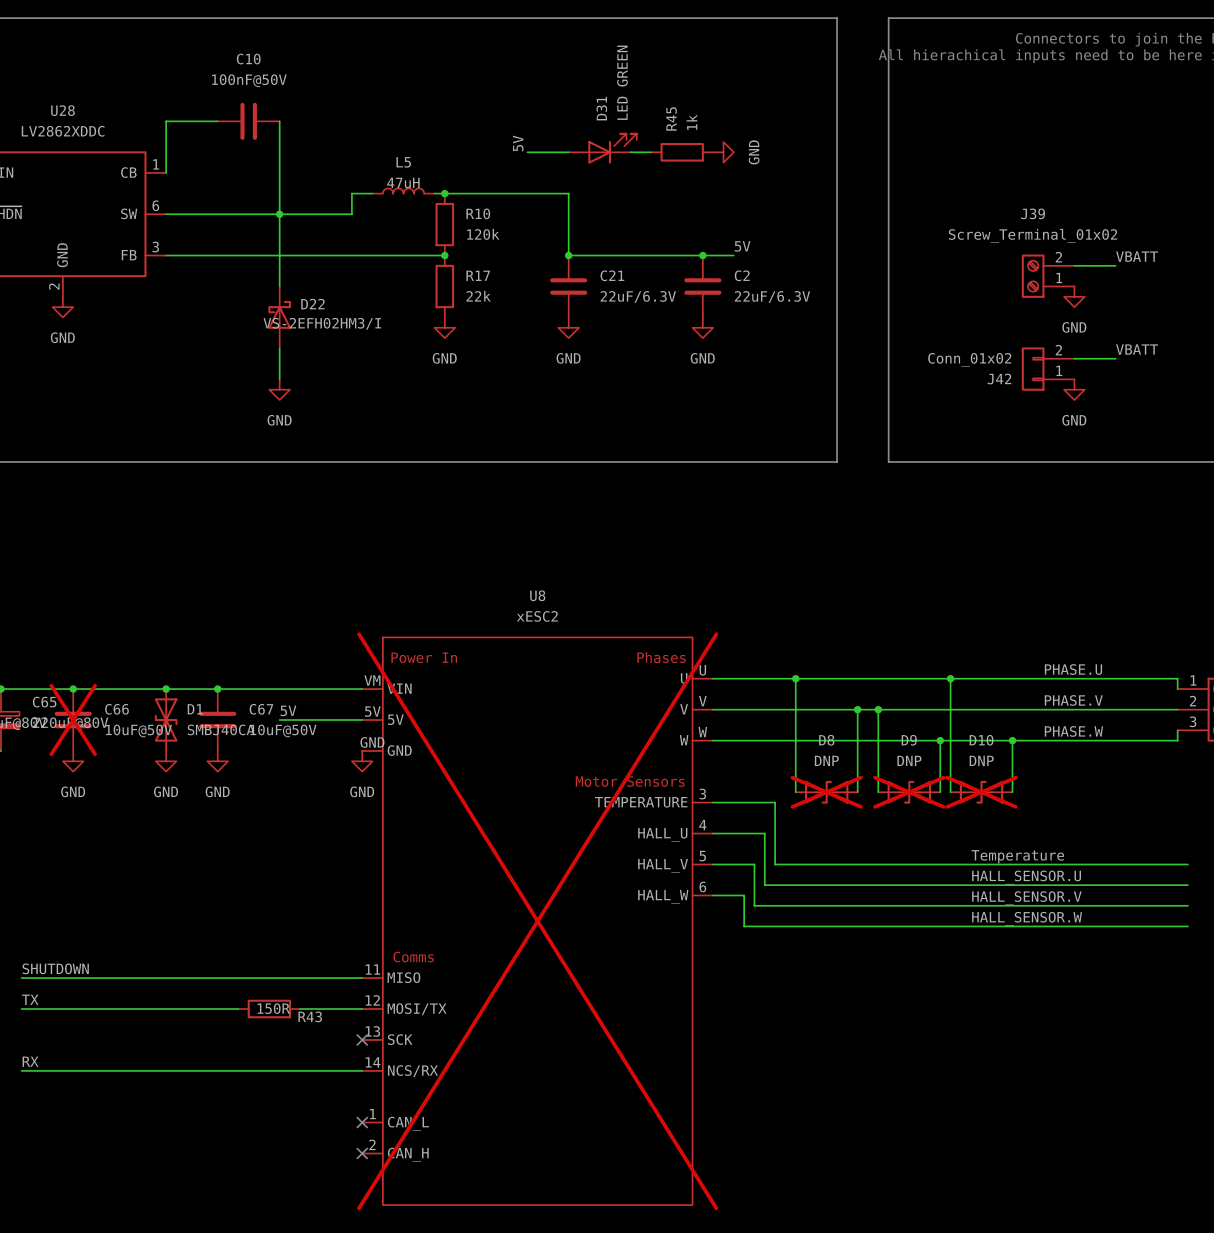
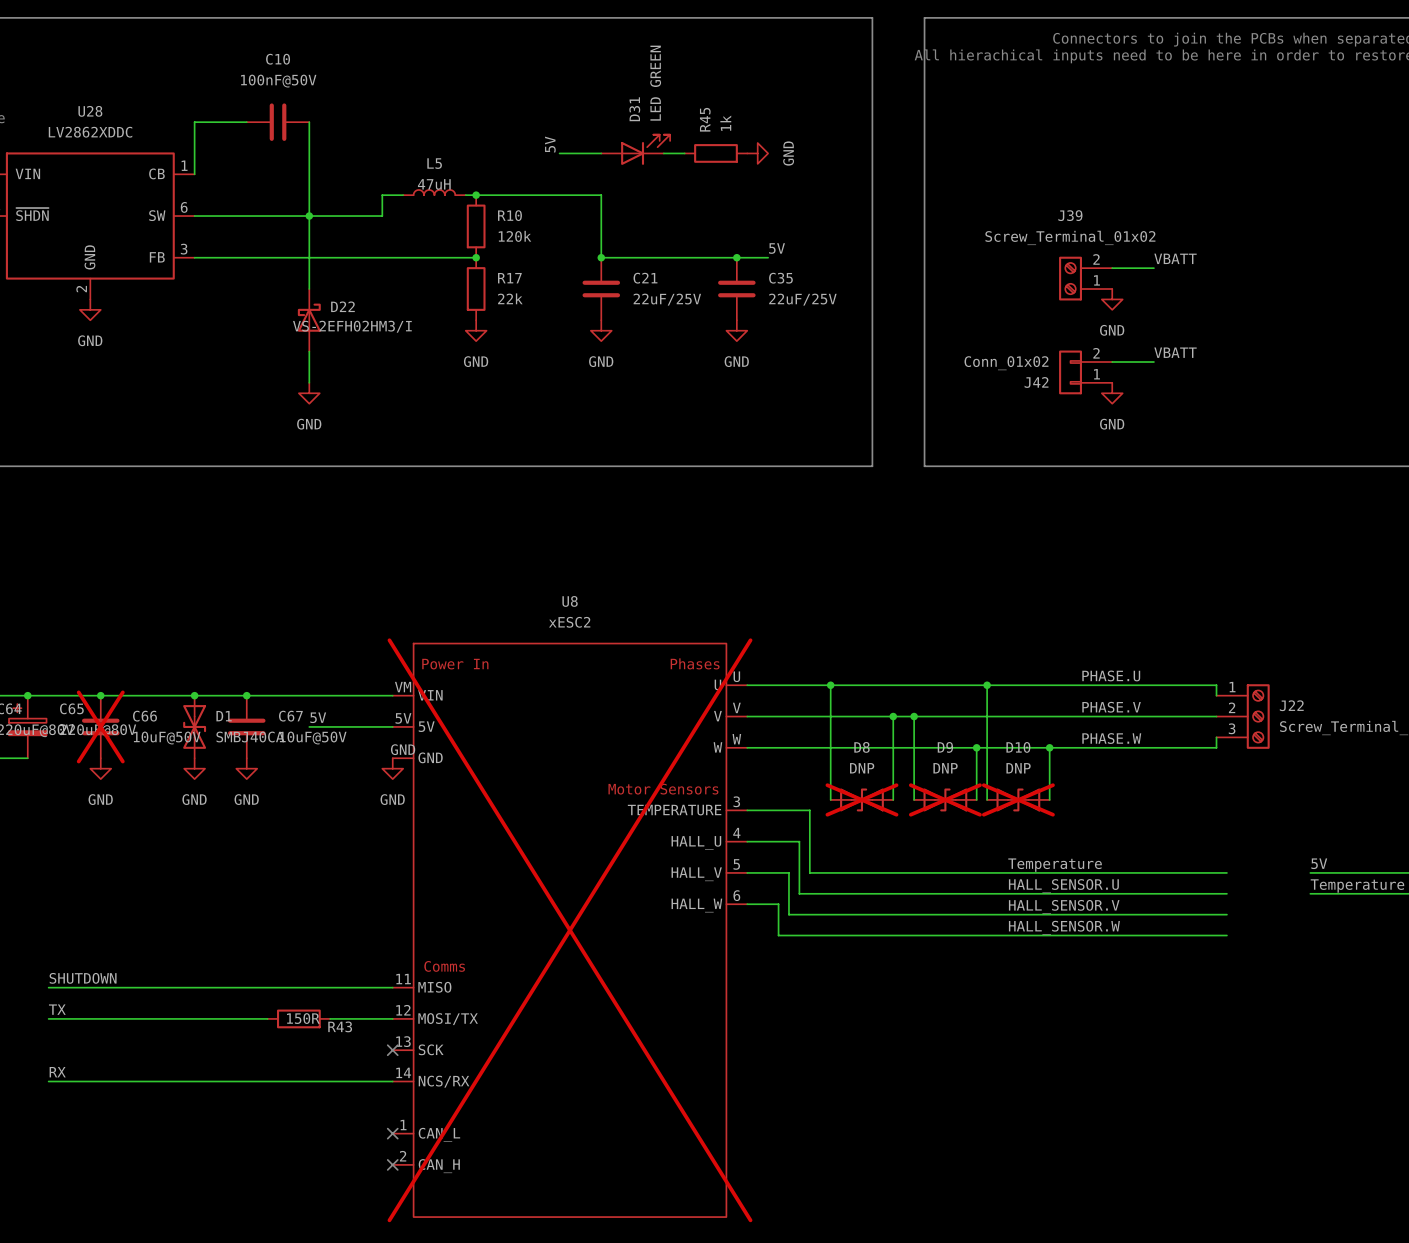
C2 name: C2 (742, 275) -> C35 (780, 278)
C21 value: 22uF/6.3V (638, 296) -> 22uF/25V (667, 299)
C2 value: 22uF/6.3V (772, 296) -> 22uF/25V (802, 299)

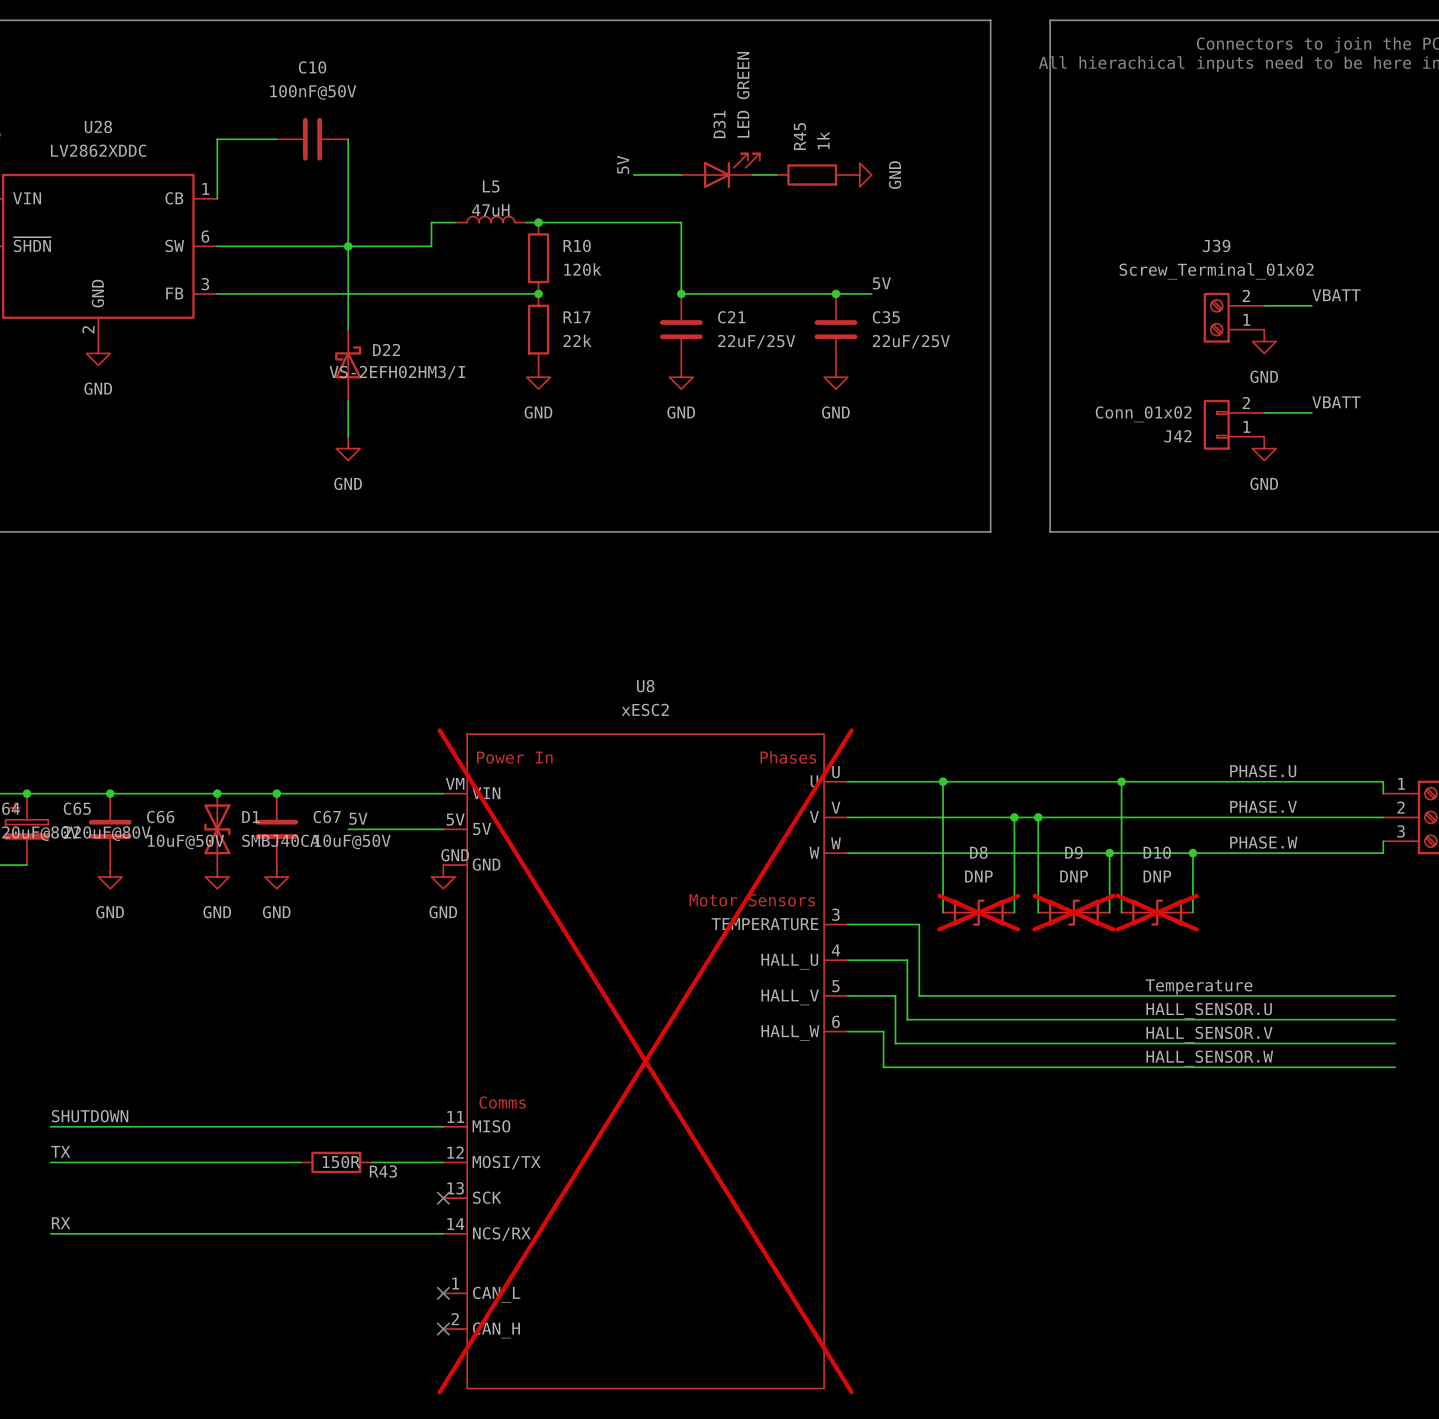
C66 do-not-place cross: (100, 726) -> none

